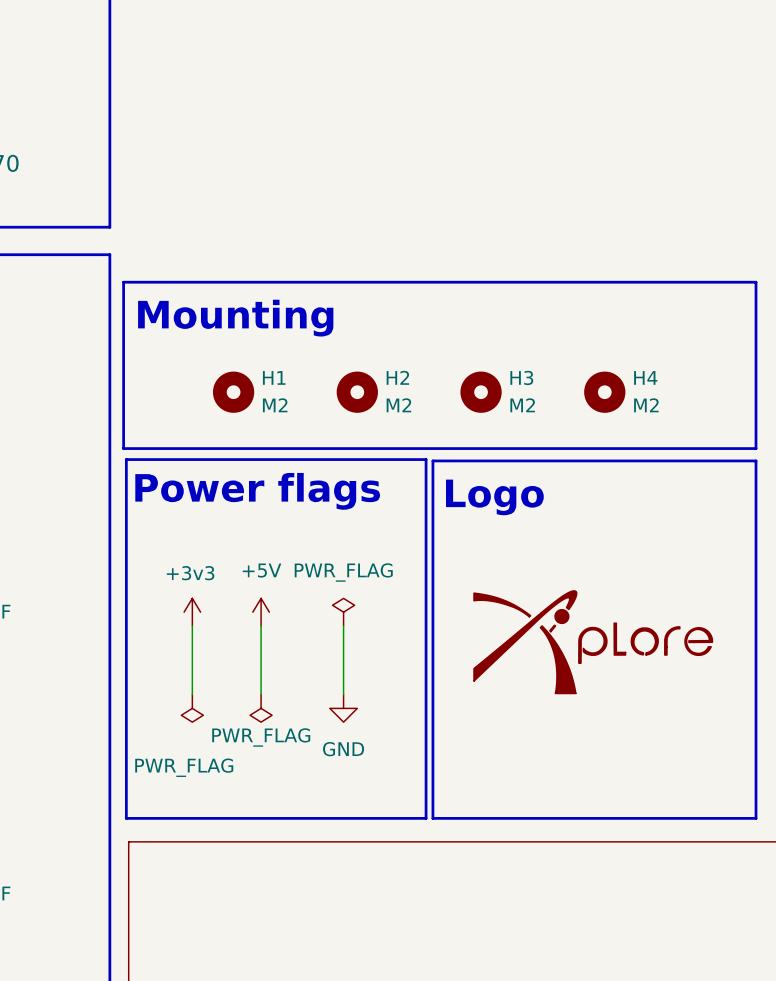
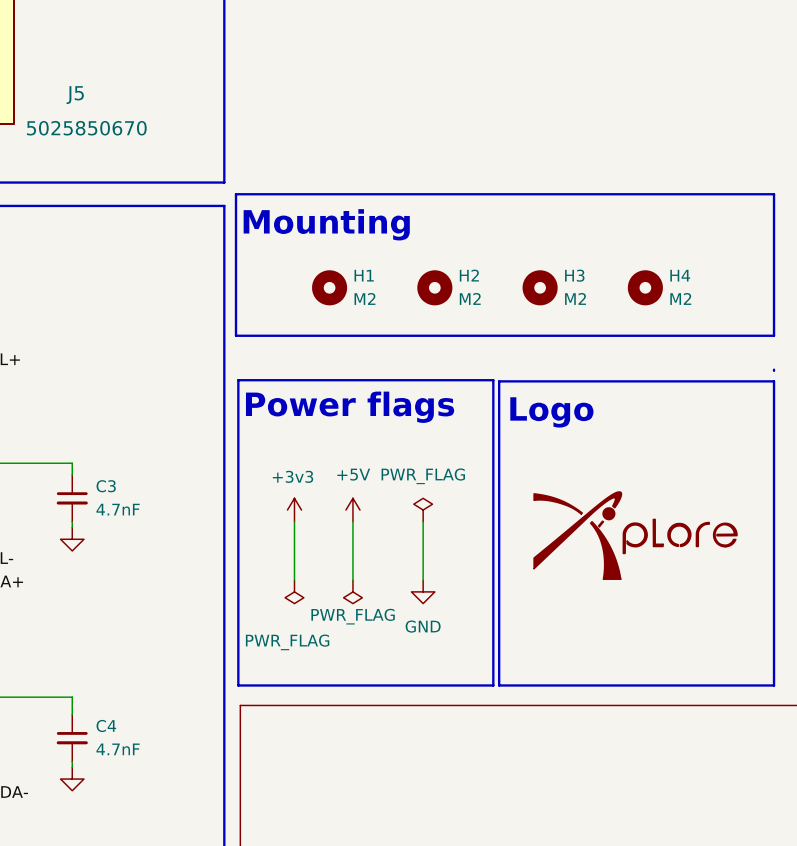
line: (123, 282) (756, 282) -> (236, 229) (236, 194) (774, 194) (774, 229)
text position: Mounting (235, 318) -> Mounting (326, 224)
H1 position: (233, 392) -> (329, 287)
H2 position: (357, 392) -> (434, 287)
H3 position: (481, 392) -> (540, 287)
H4 position: (604, 392) -> (645, 287)
line: (123, 407) (123, 448) (756, 448) -> (236, 335) (774, 335)
line: (756, 407) (756, 447) -> none

